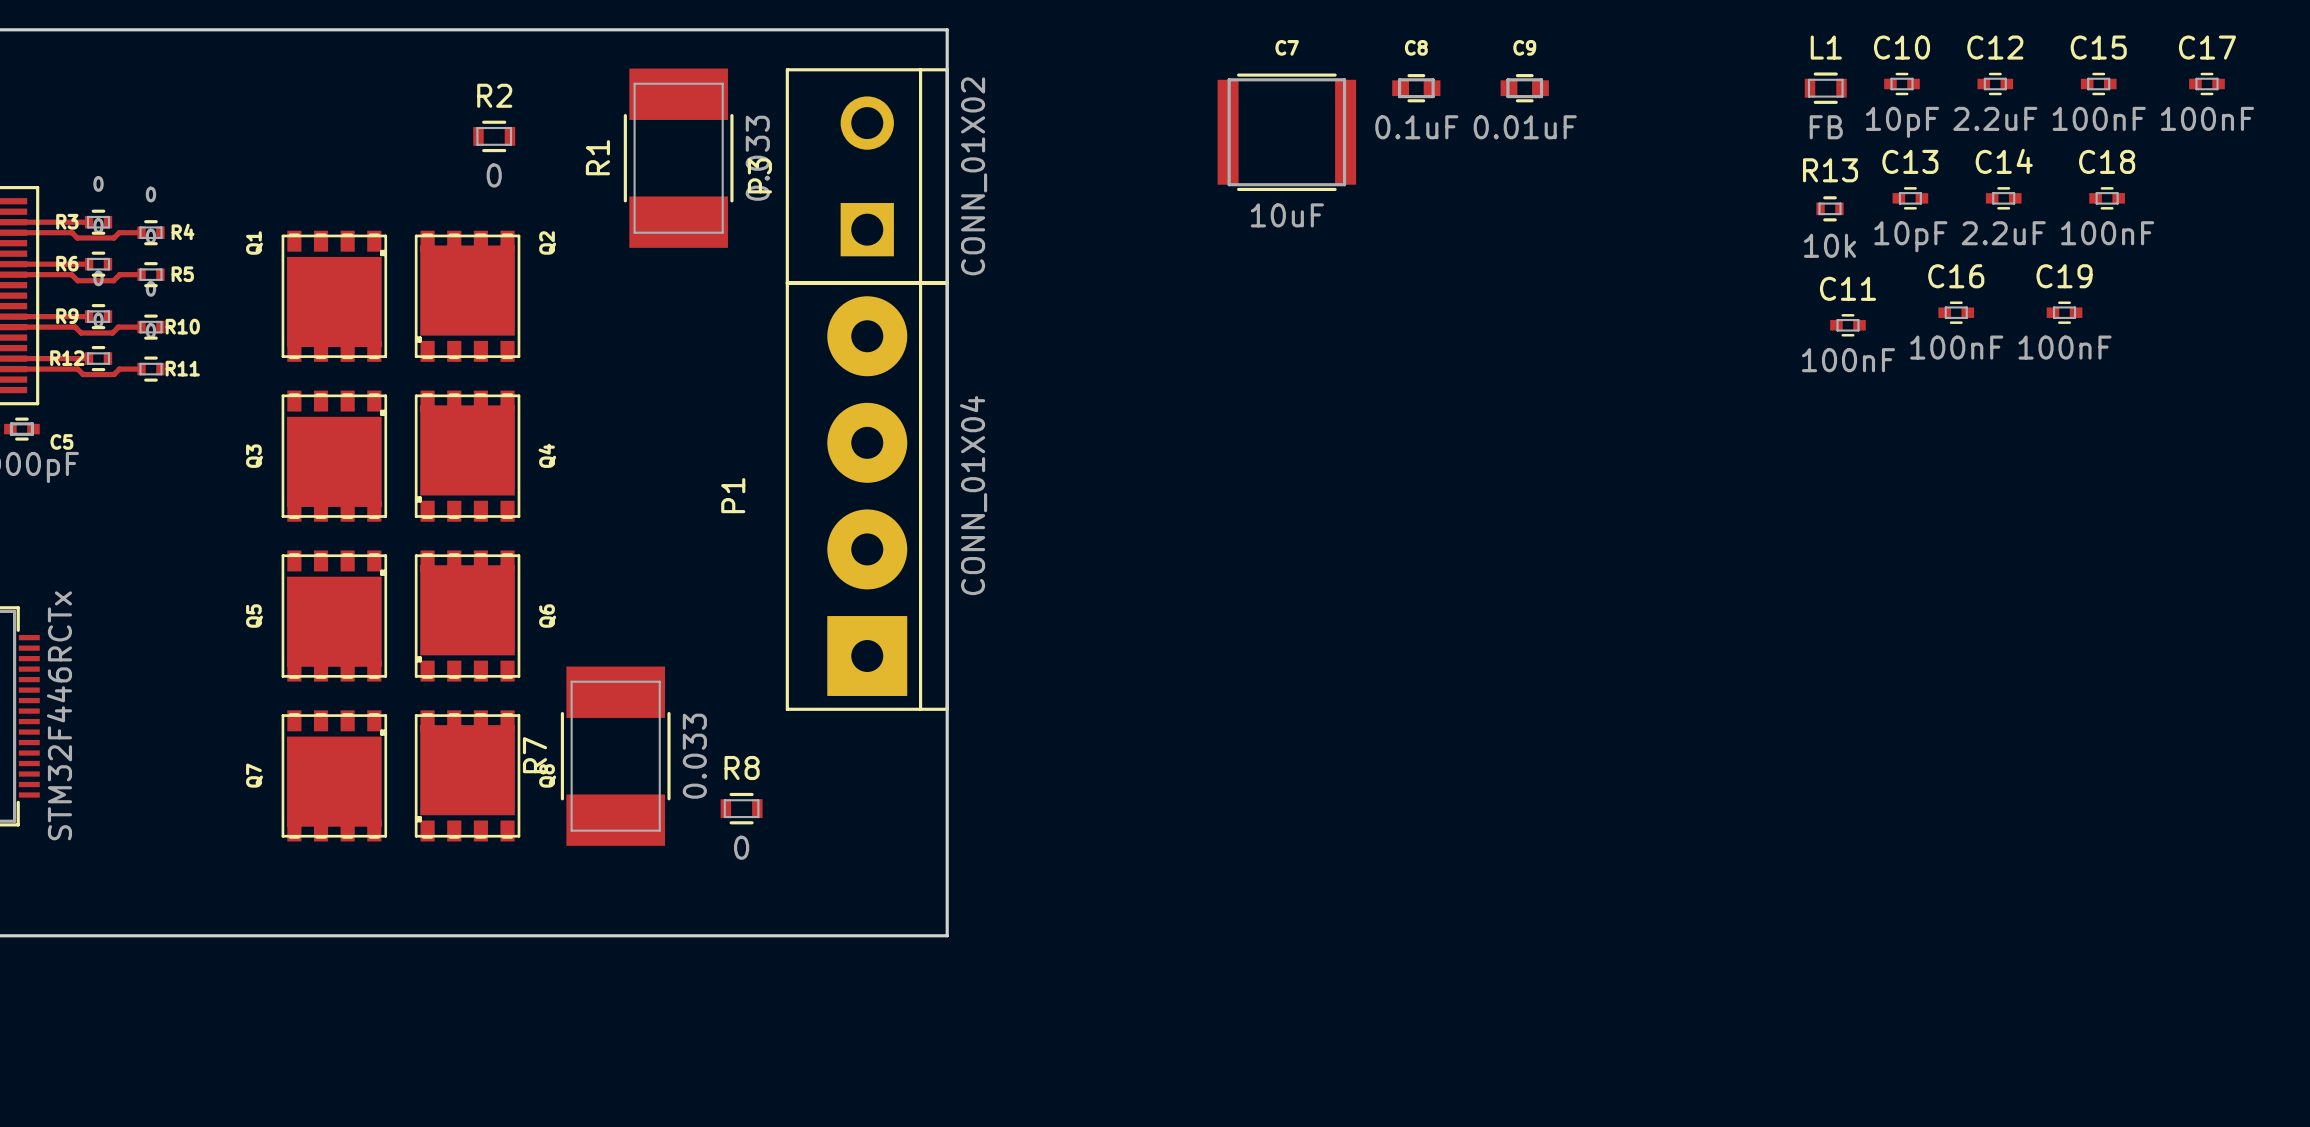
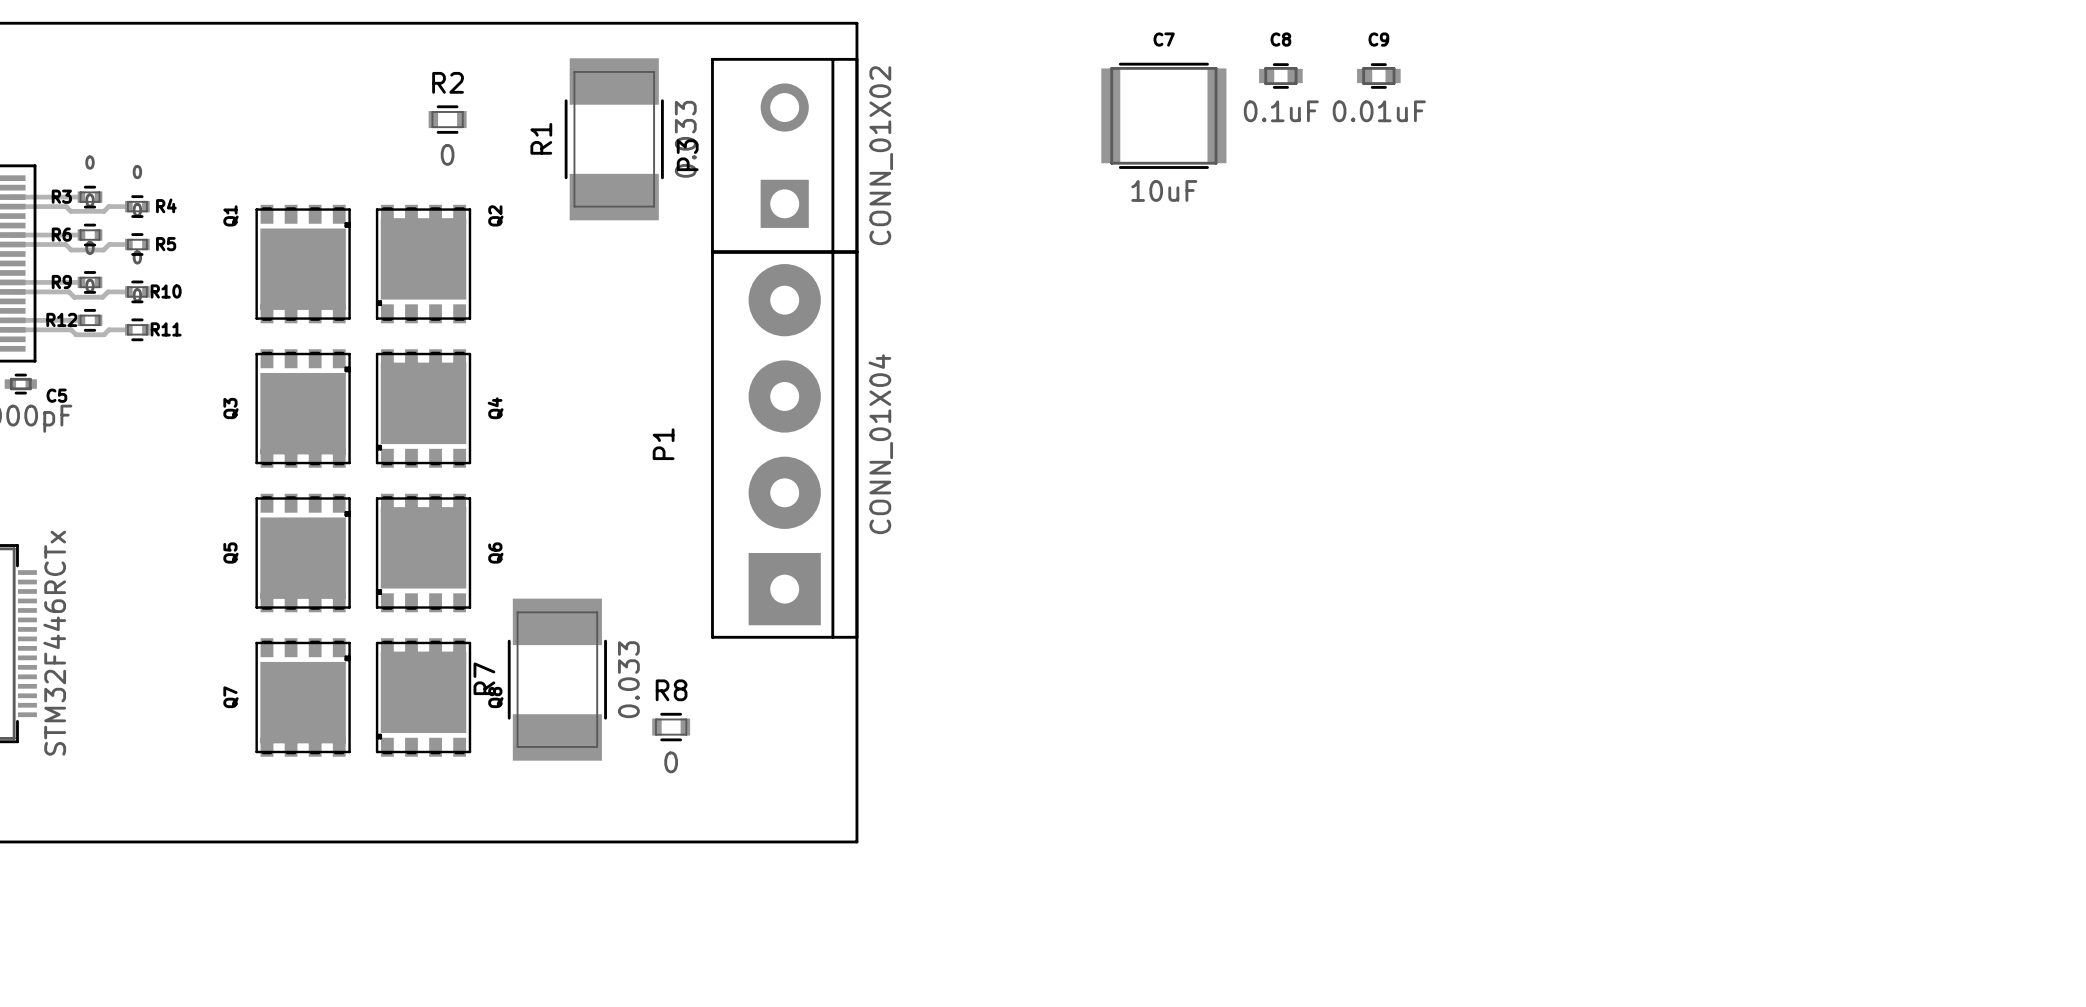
C10: 10pF (1901, 84) -> none
C12: 2.2uF (1995, 84) -> none
C15: 100nF (2098, 84) -> none
C17: 100nF (2206, 84) -> none
L1: FB (1825, 88) -> none
C13: 10pF (1910, 198) -> none
C14: 2.2uF (2003, 198) -> none
C18: 100nF (2107, 198) -> none
R13: 10k (1830, 208) -> none
C16: 100nF (1956, 312) -> none
C19: 100nF (2064, 312) -> none
C11: 100nF (1847, 325) -> none

